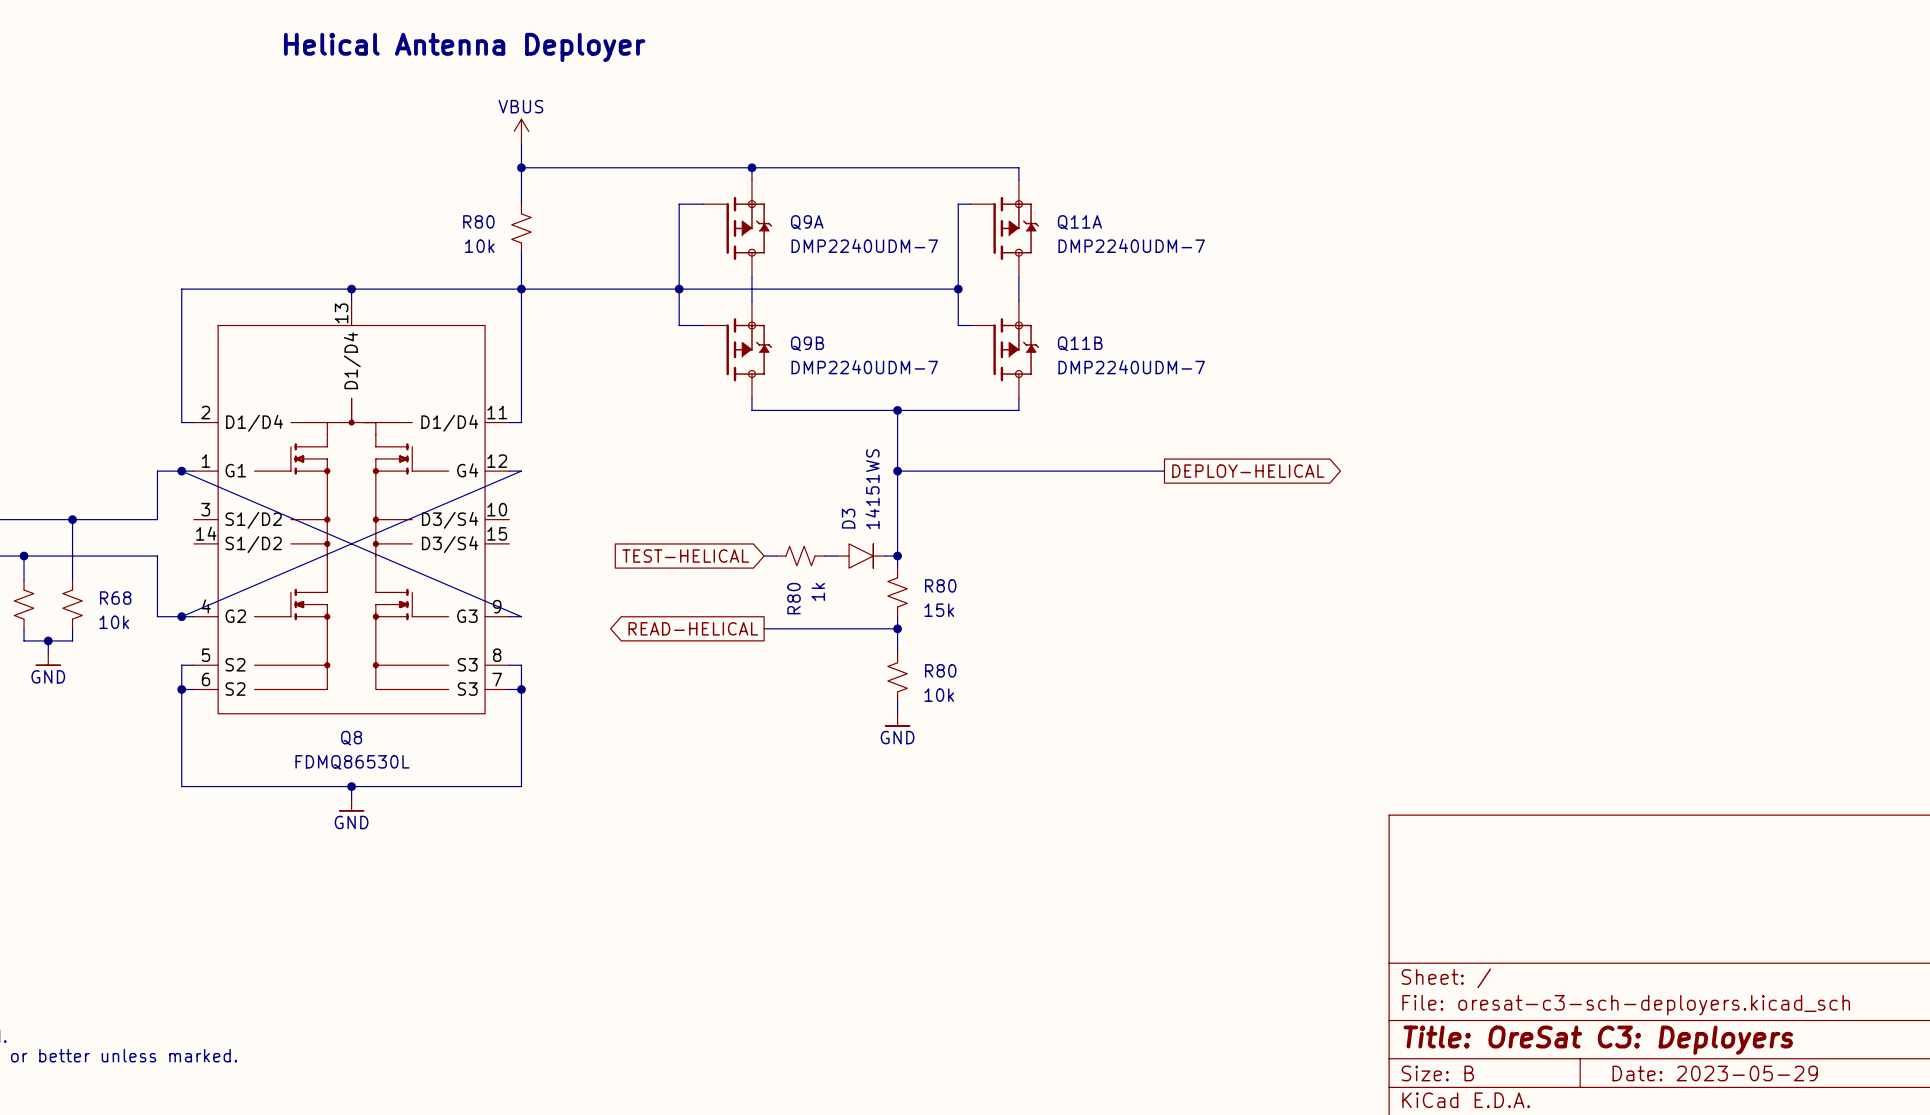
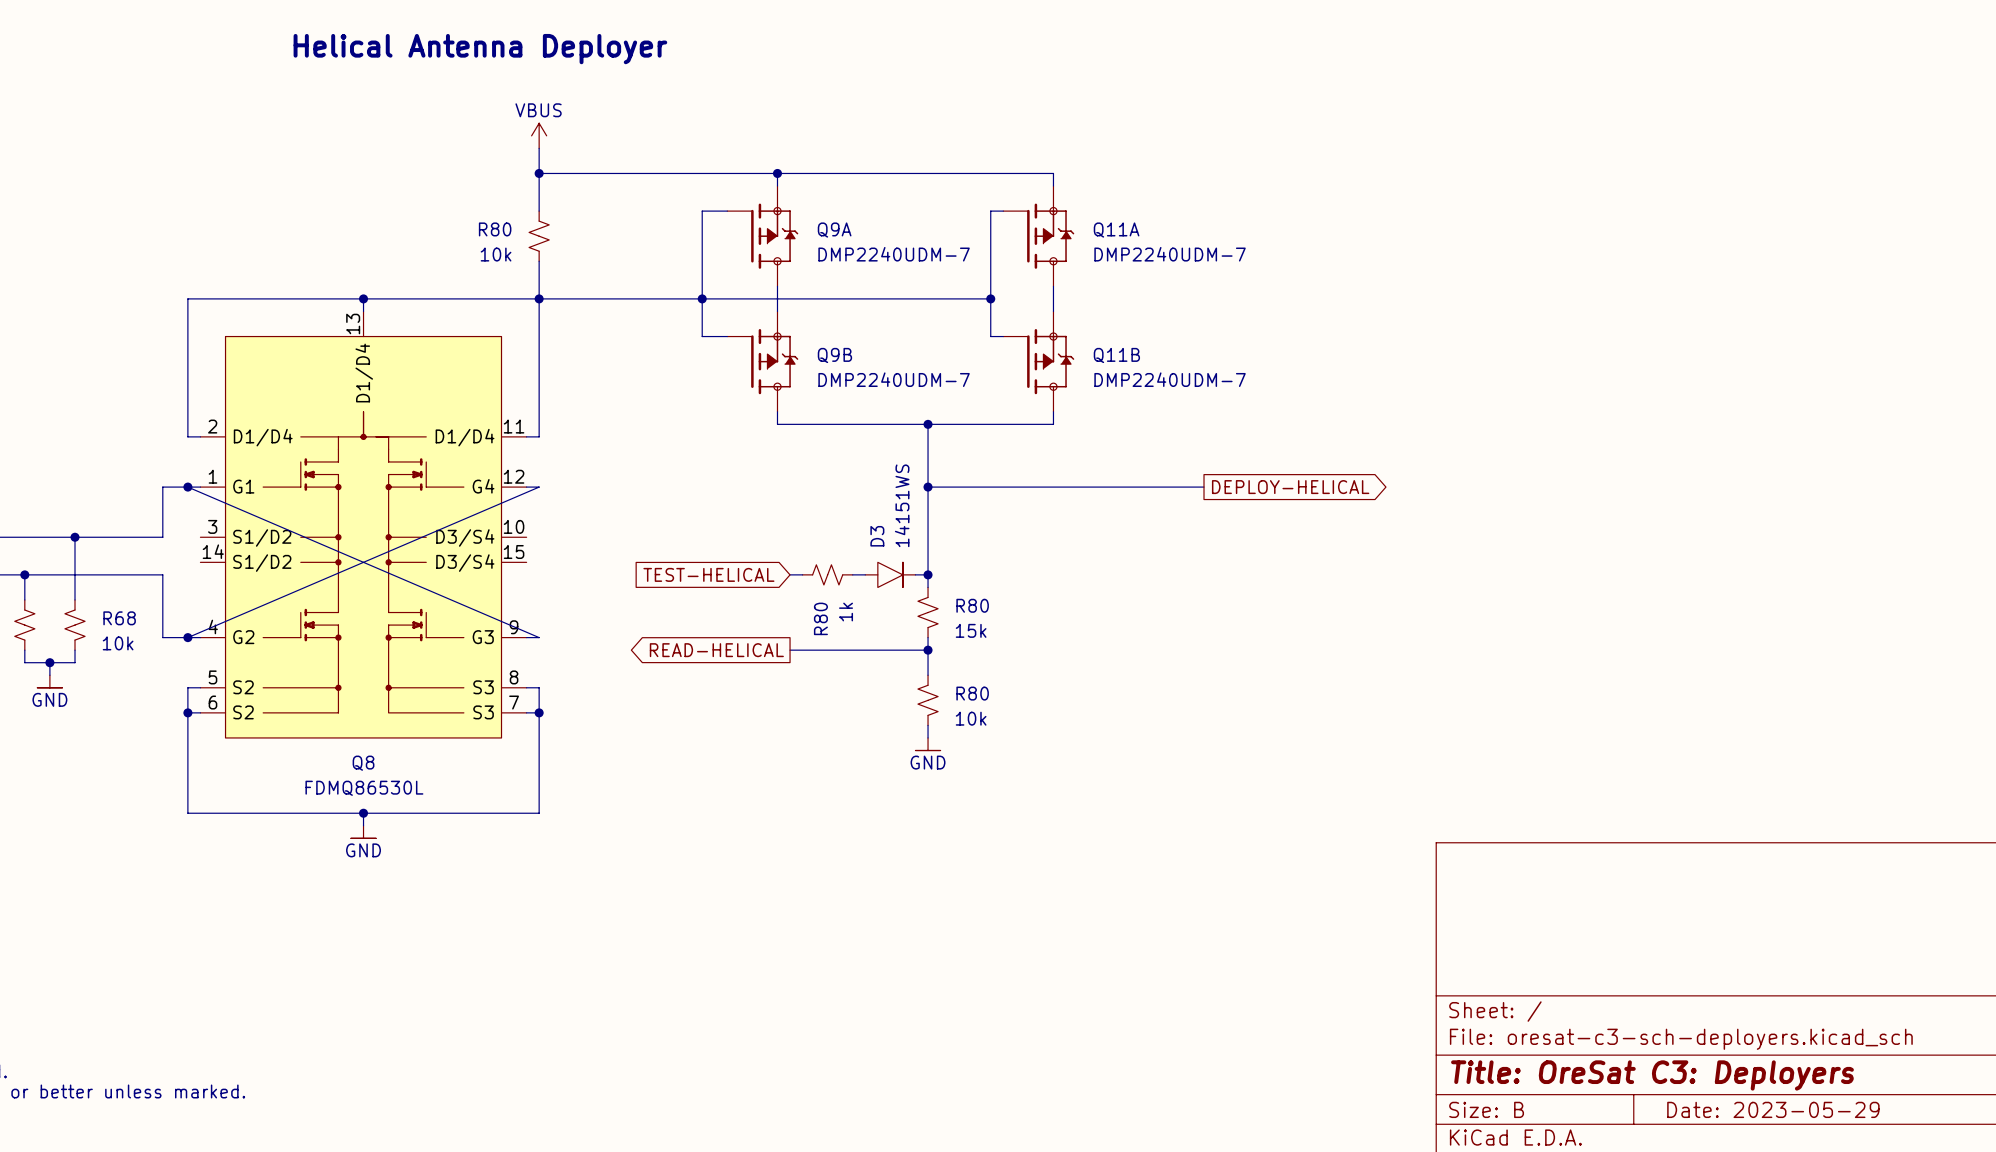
Q8 symbol: [193, 301, 510, 714] -> [200, 311, 527, 738]

